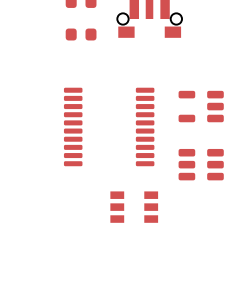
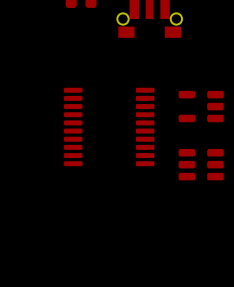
part: (81, 34) -> none
part: (134, 207) -> none

